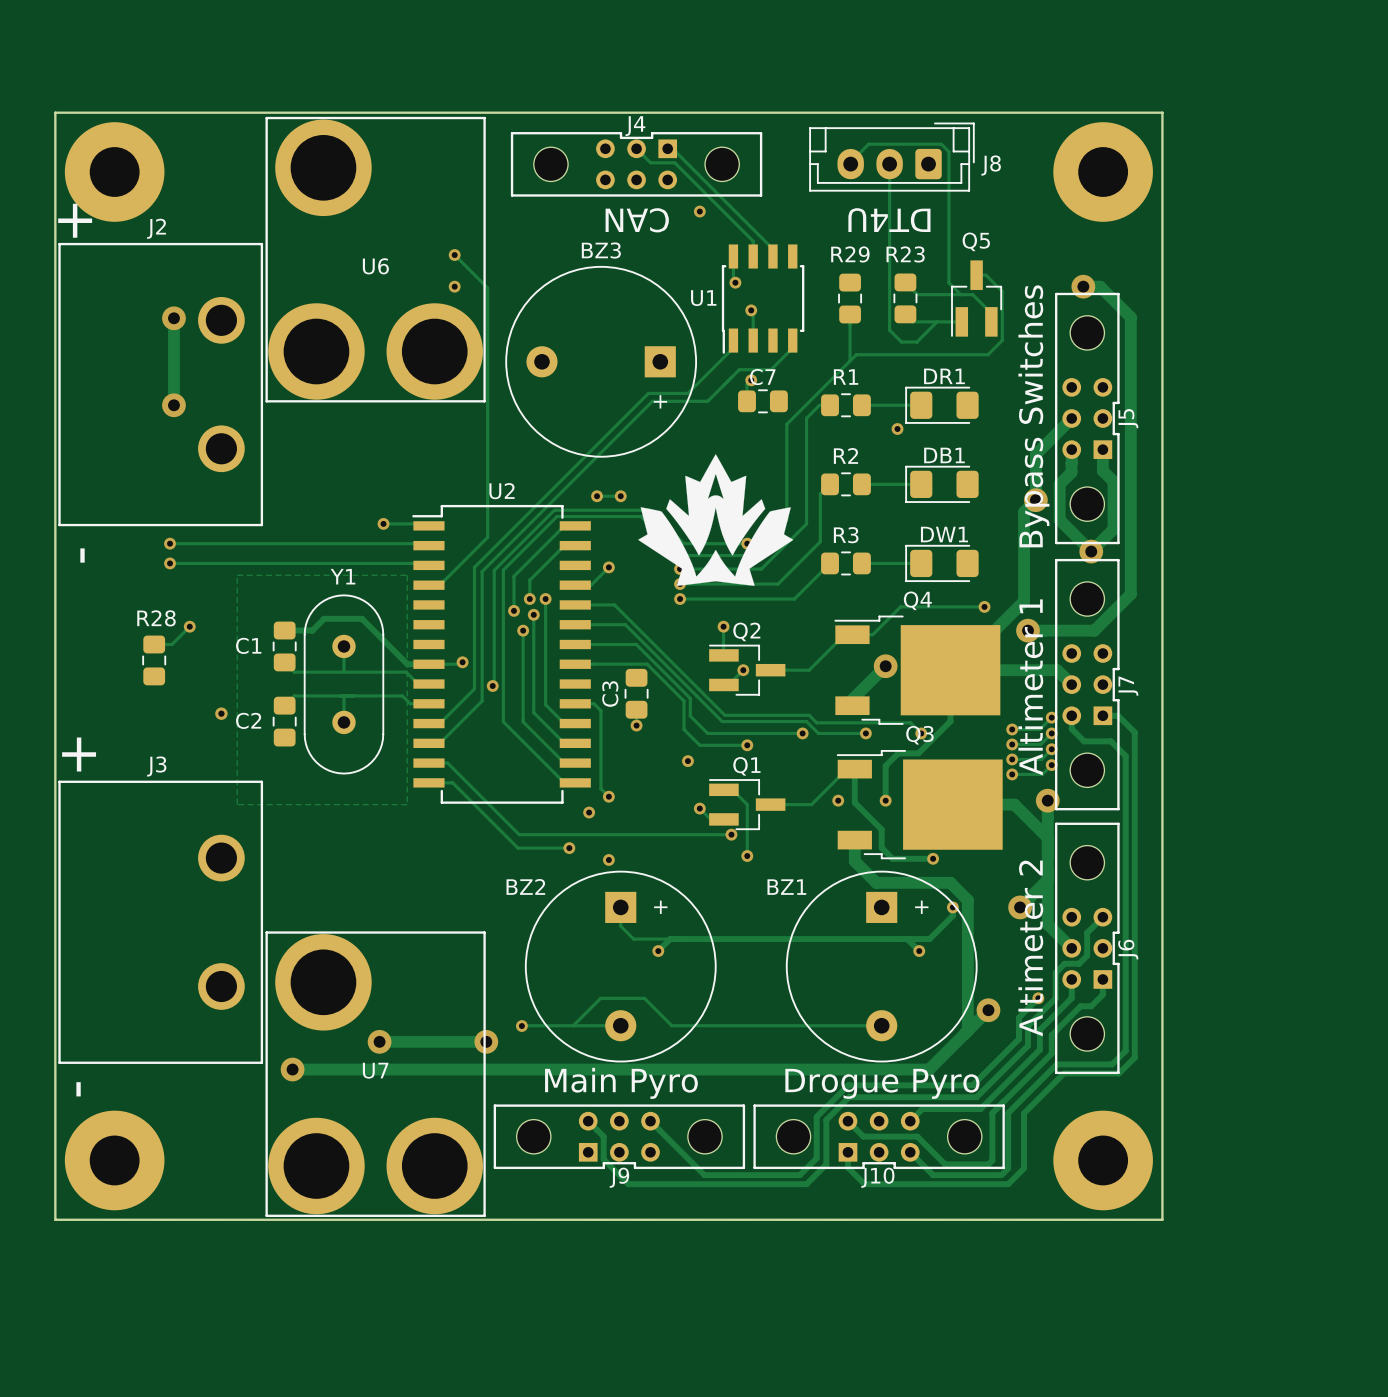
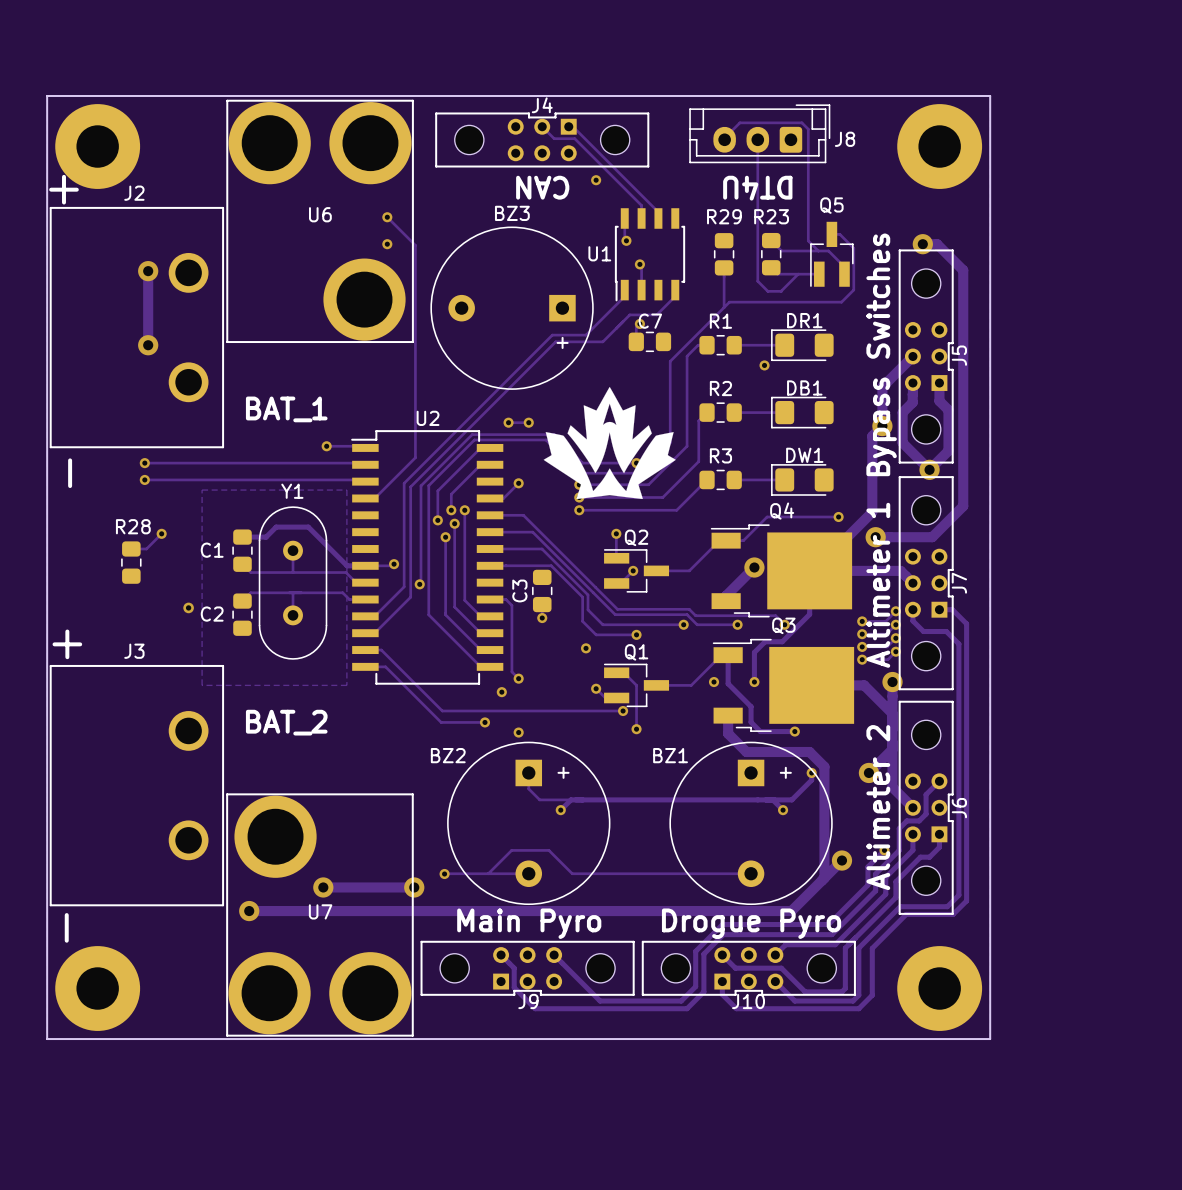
U6 rotation: 0° (375, 259) -> 180° (320, 221)
text: none -> BAT_1 (286, 409)
text: none -> BAT_2 (286, 722)

